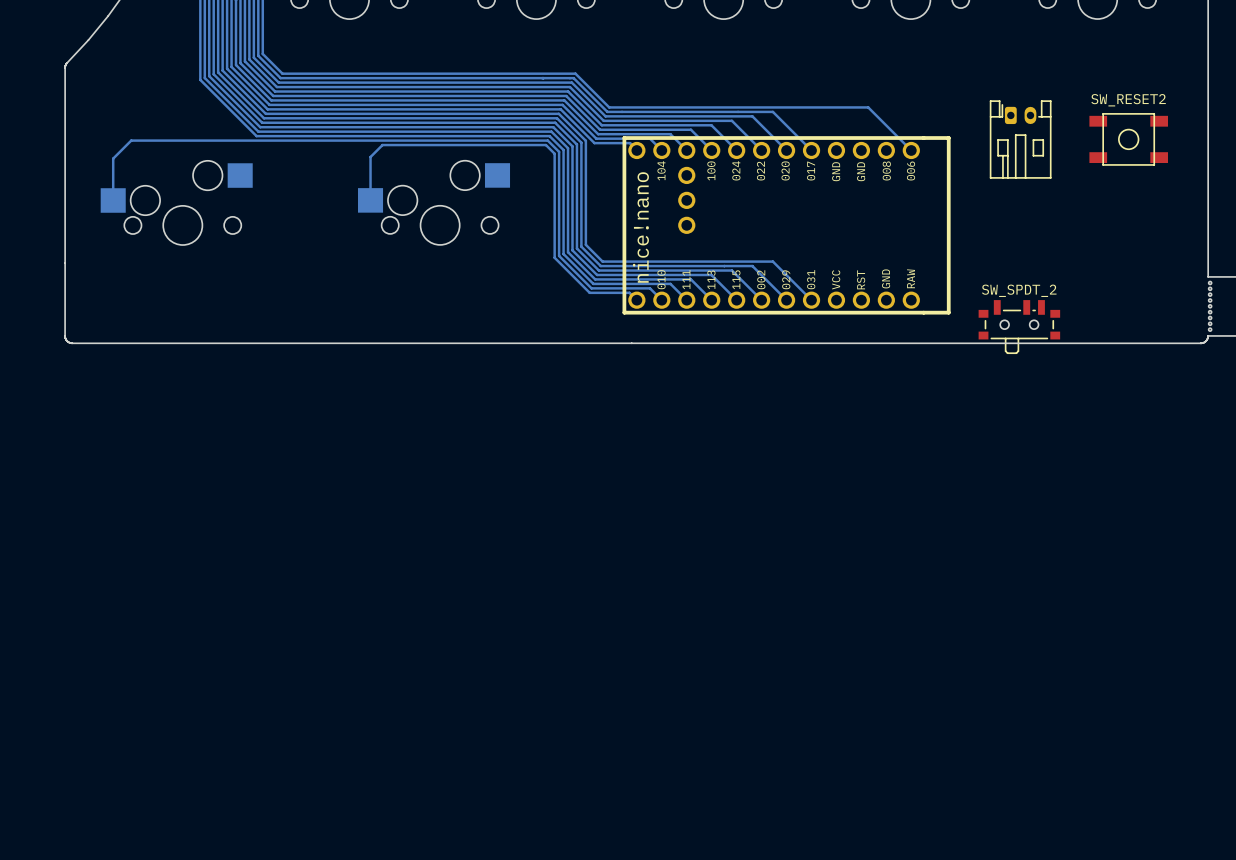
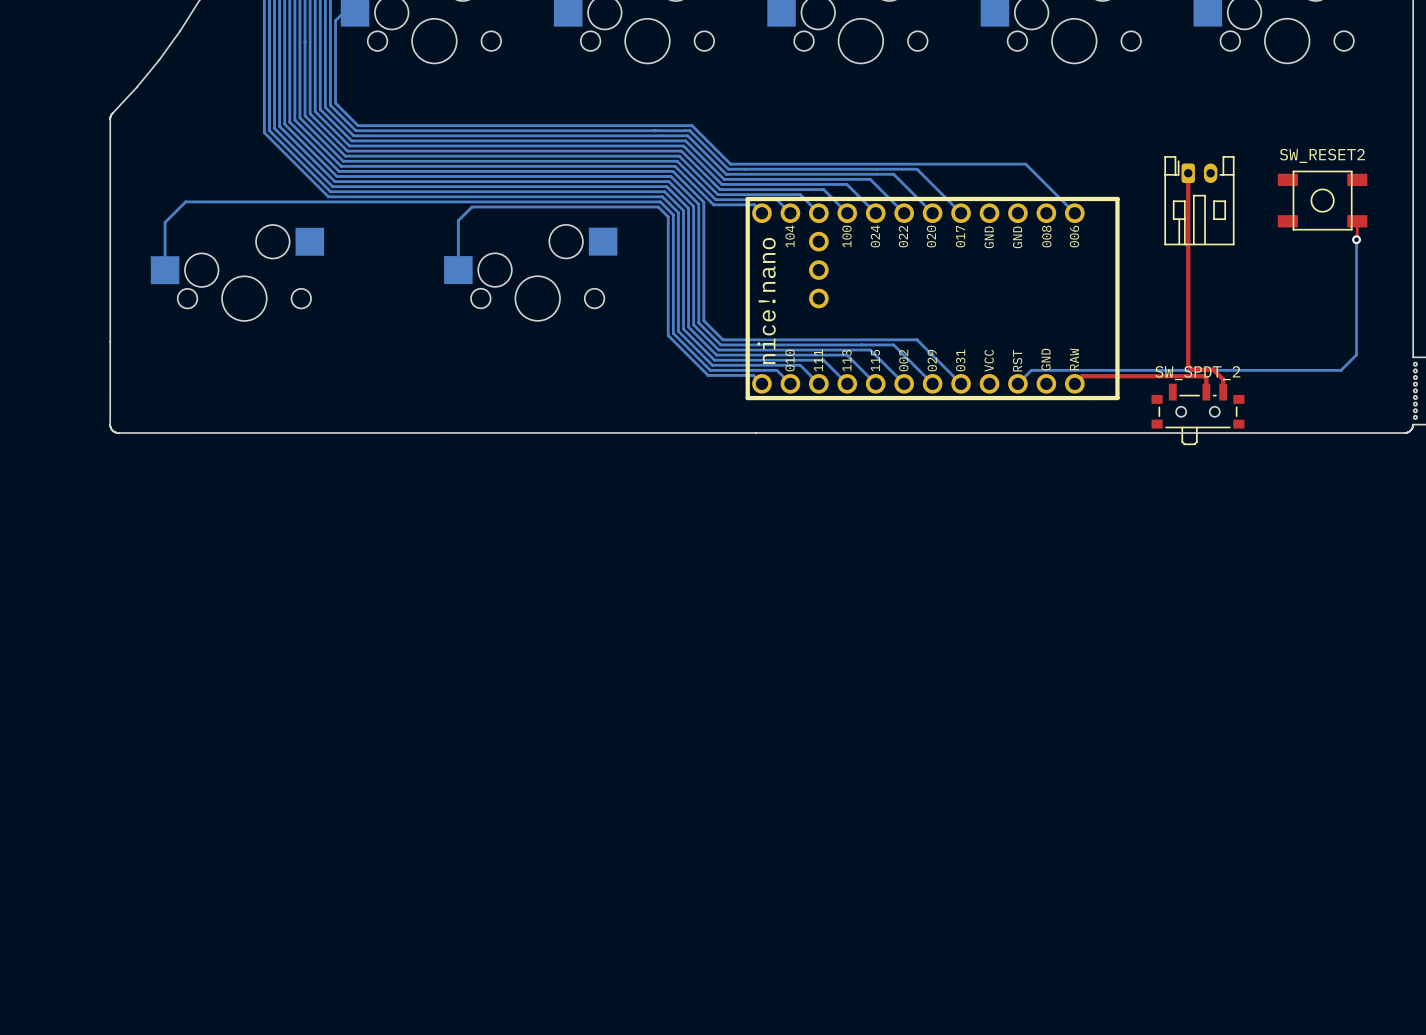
top track: none -> (1188, 173) (1188, 365) (1192, 369) (1213, 369) (1223, 379) (1223, 392)
top track: none -> (1357, 221) (1356, 239)
bottom track: none -> (1356, 239) (1356, 354) (1341, 370) (1031, 370) (1017, 383)
via: none -> (1356, 239)
top track: none -> (1074, 383) (1082, 376) (1204, 376) (1206, 378) (1206, 392)

